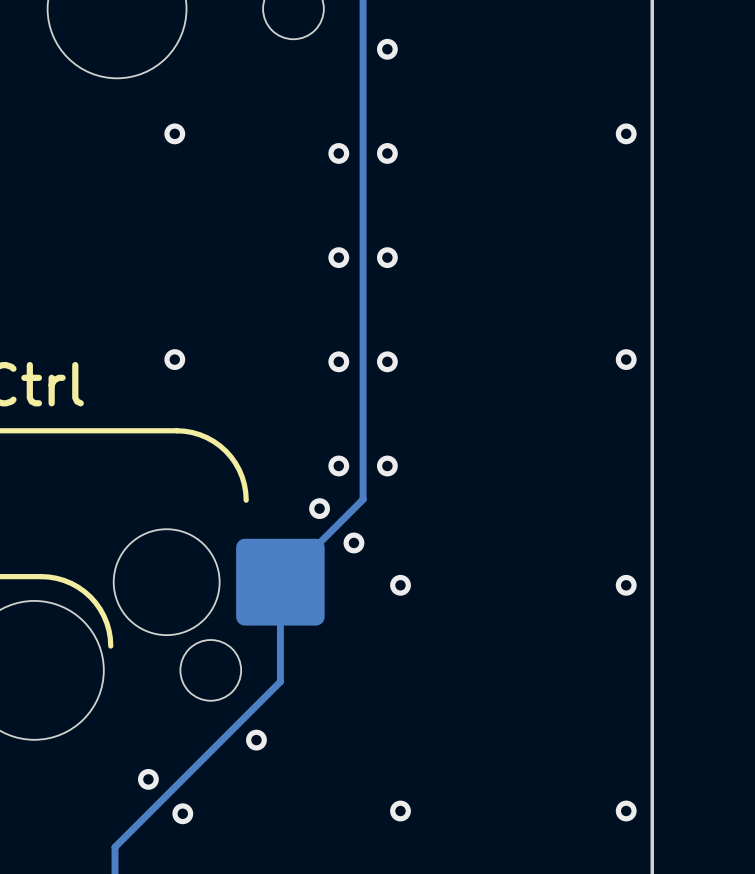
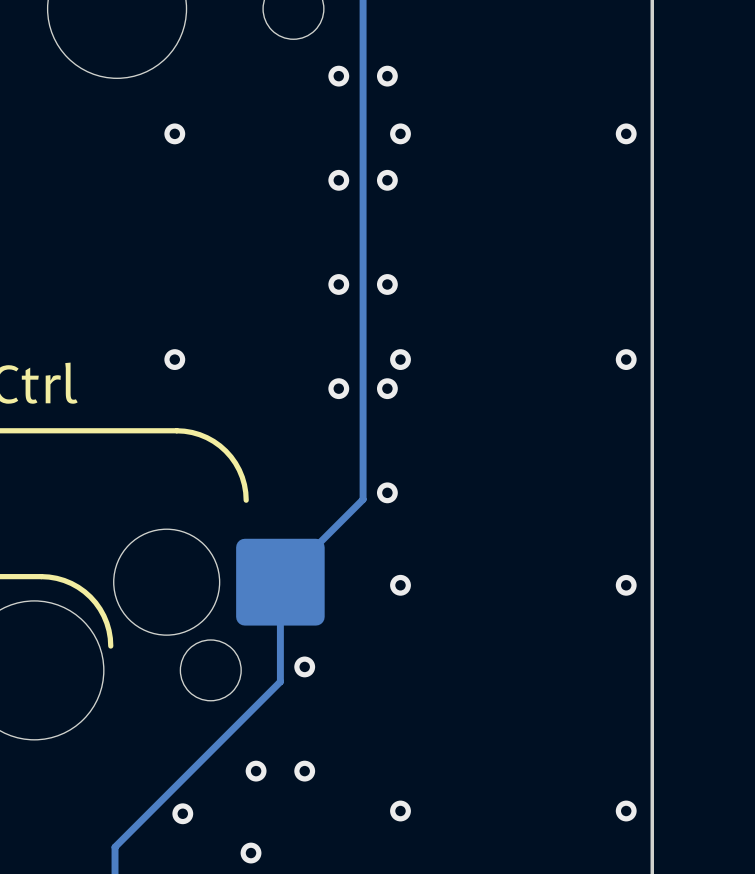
via position: (387, 49) -> (387, 76)
via: none -> (338, 76)
via position: (338, 153) -> (338, 180)
via position: (387, 153) -> (400, 133)
via: none -> (387, 180)
via position: (338, 257) -> (338, 284)
via position: (387, 257) -> (387, 284)
via position: (338, 361) -> (338, 388)
via position: (387, 361) -> (400, 359)
via: none -> (387, 388)
via: (338, 465) -> none
via position: (387, 465) -> (387, 492)
via: (319, 508) -> none
via: (353, 542) -> none
via: none -> (304, 666)
via: (256, 740) -> none
via: none -> (256, 771)
via: none -> (304, 771)
via: (148, 779) -> none
via: none -> (251, 853)

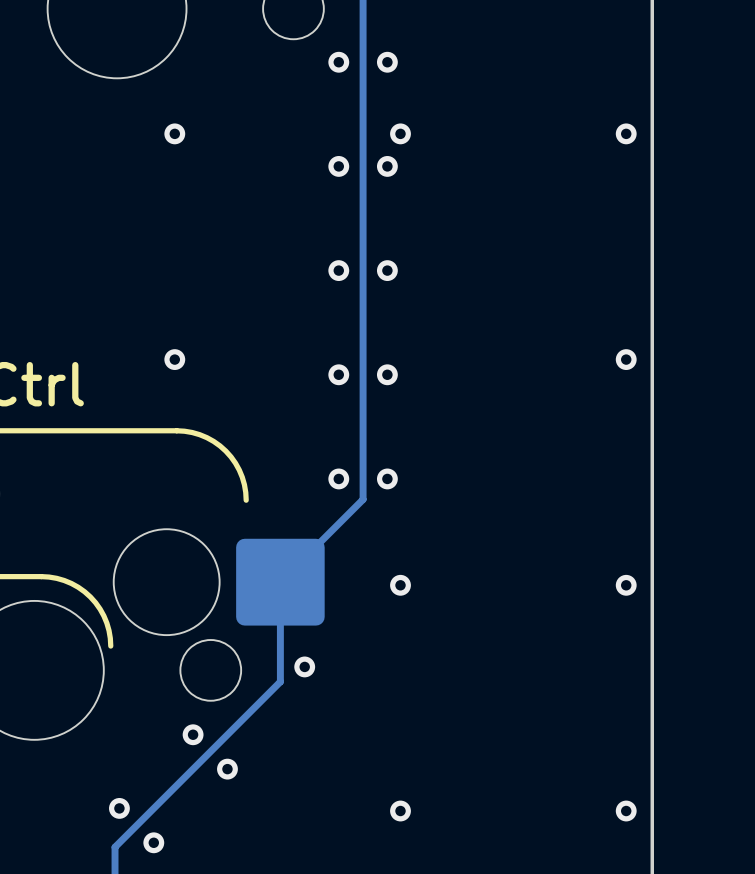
via position: (338, 76) -> (338, 62)
via position: (387, 76) -> (387, 62)
via position: (338, 180) -> (338, 166)
via position: (387, 180) -> (387, 166)
via position: (338, 284) -> (338, 270)
via position: (387, 284) -> (387, 270)
via: (400, 359) -> none
via: none -> (387, 374)
via position: (338, 388) -> (338, 374)
via: (387, 388) -> none
via: none -> (338, 478)
via position: (387, 492) -> (387, 478)
via: none -> (193, 734)
via position: (256, 771) -> (227, 769)
via: (304, 771) -> none
via: none -> (119, 808)
via: (182, 813) -> none
via: none -> (153, 842)
via: (251, 853) -> none

